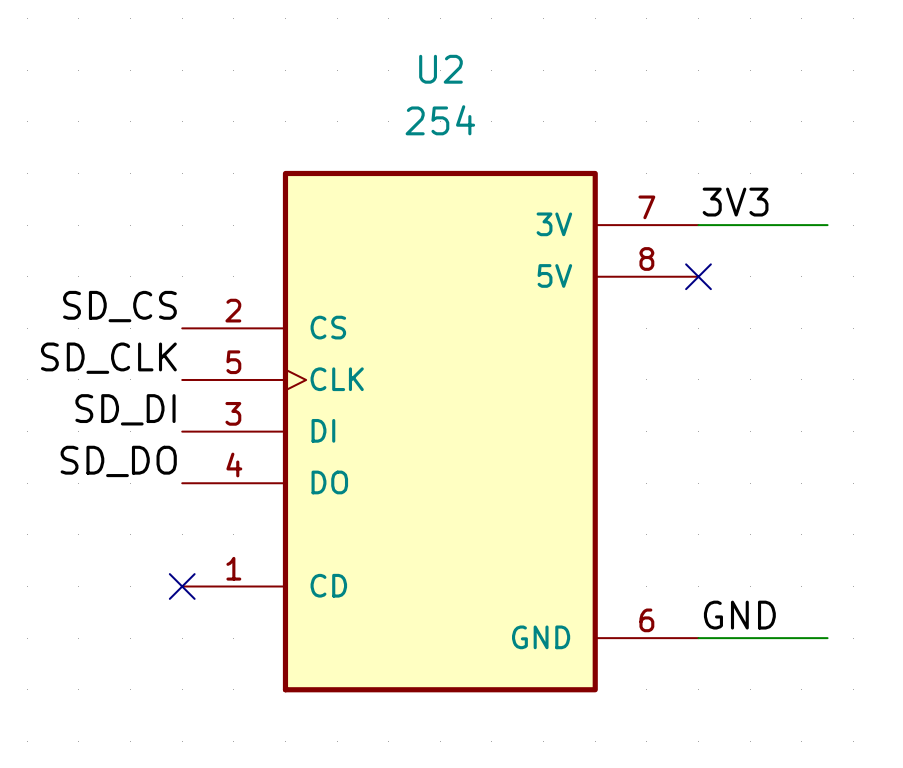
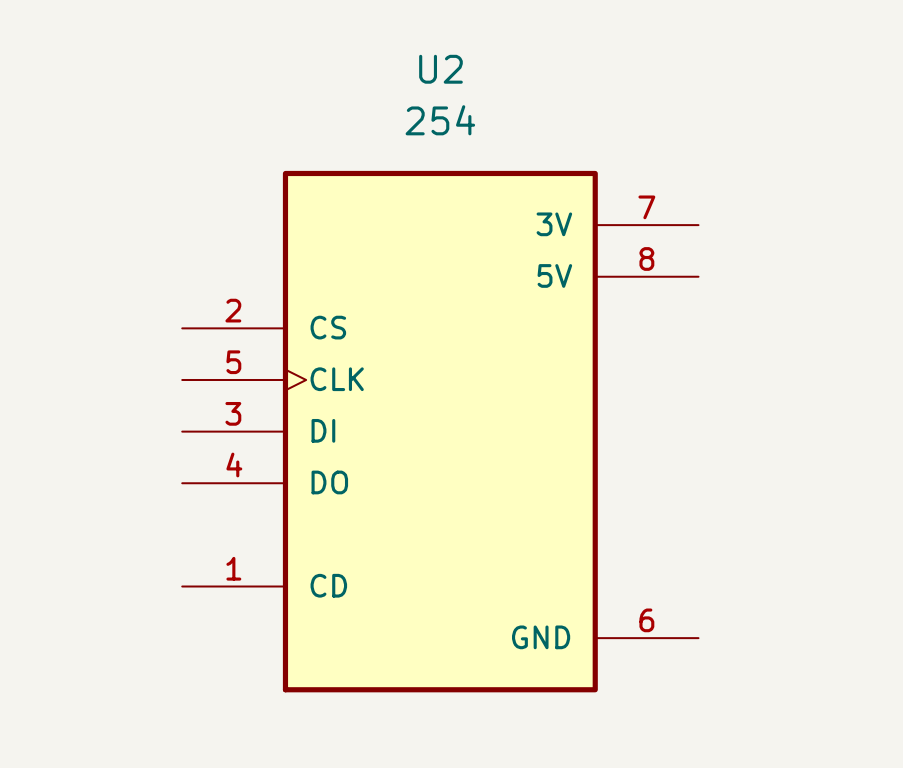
label: 3V3 (735, 202) -> none
wire: (698, 225) (827, 225) -> none
no-connect mark: (698, 276) -> none
label: SD_CS (119, 306) -> none
label: SD_CLK (108, 358) -> none
label: SD_DI (125, 409) -> none
label: SD_DO (118, 461) -> none
no-connect mark: (182, 586) -> none
label: GND (739, 615) -> none
wire: (698, 638) (827, 638) -> none

